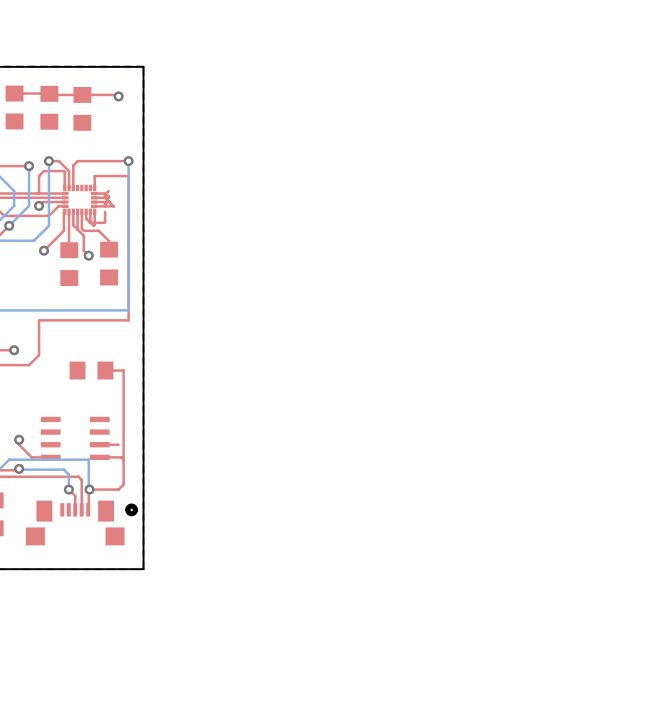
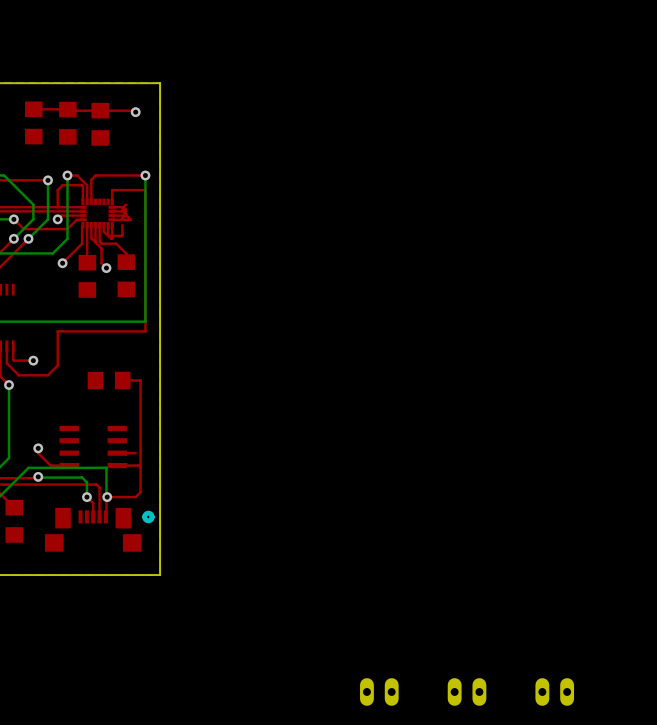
part: none -> (379, 691)
part: none -> (467, 691)
part: none -> (554, 691)

